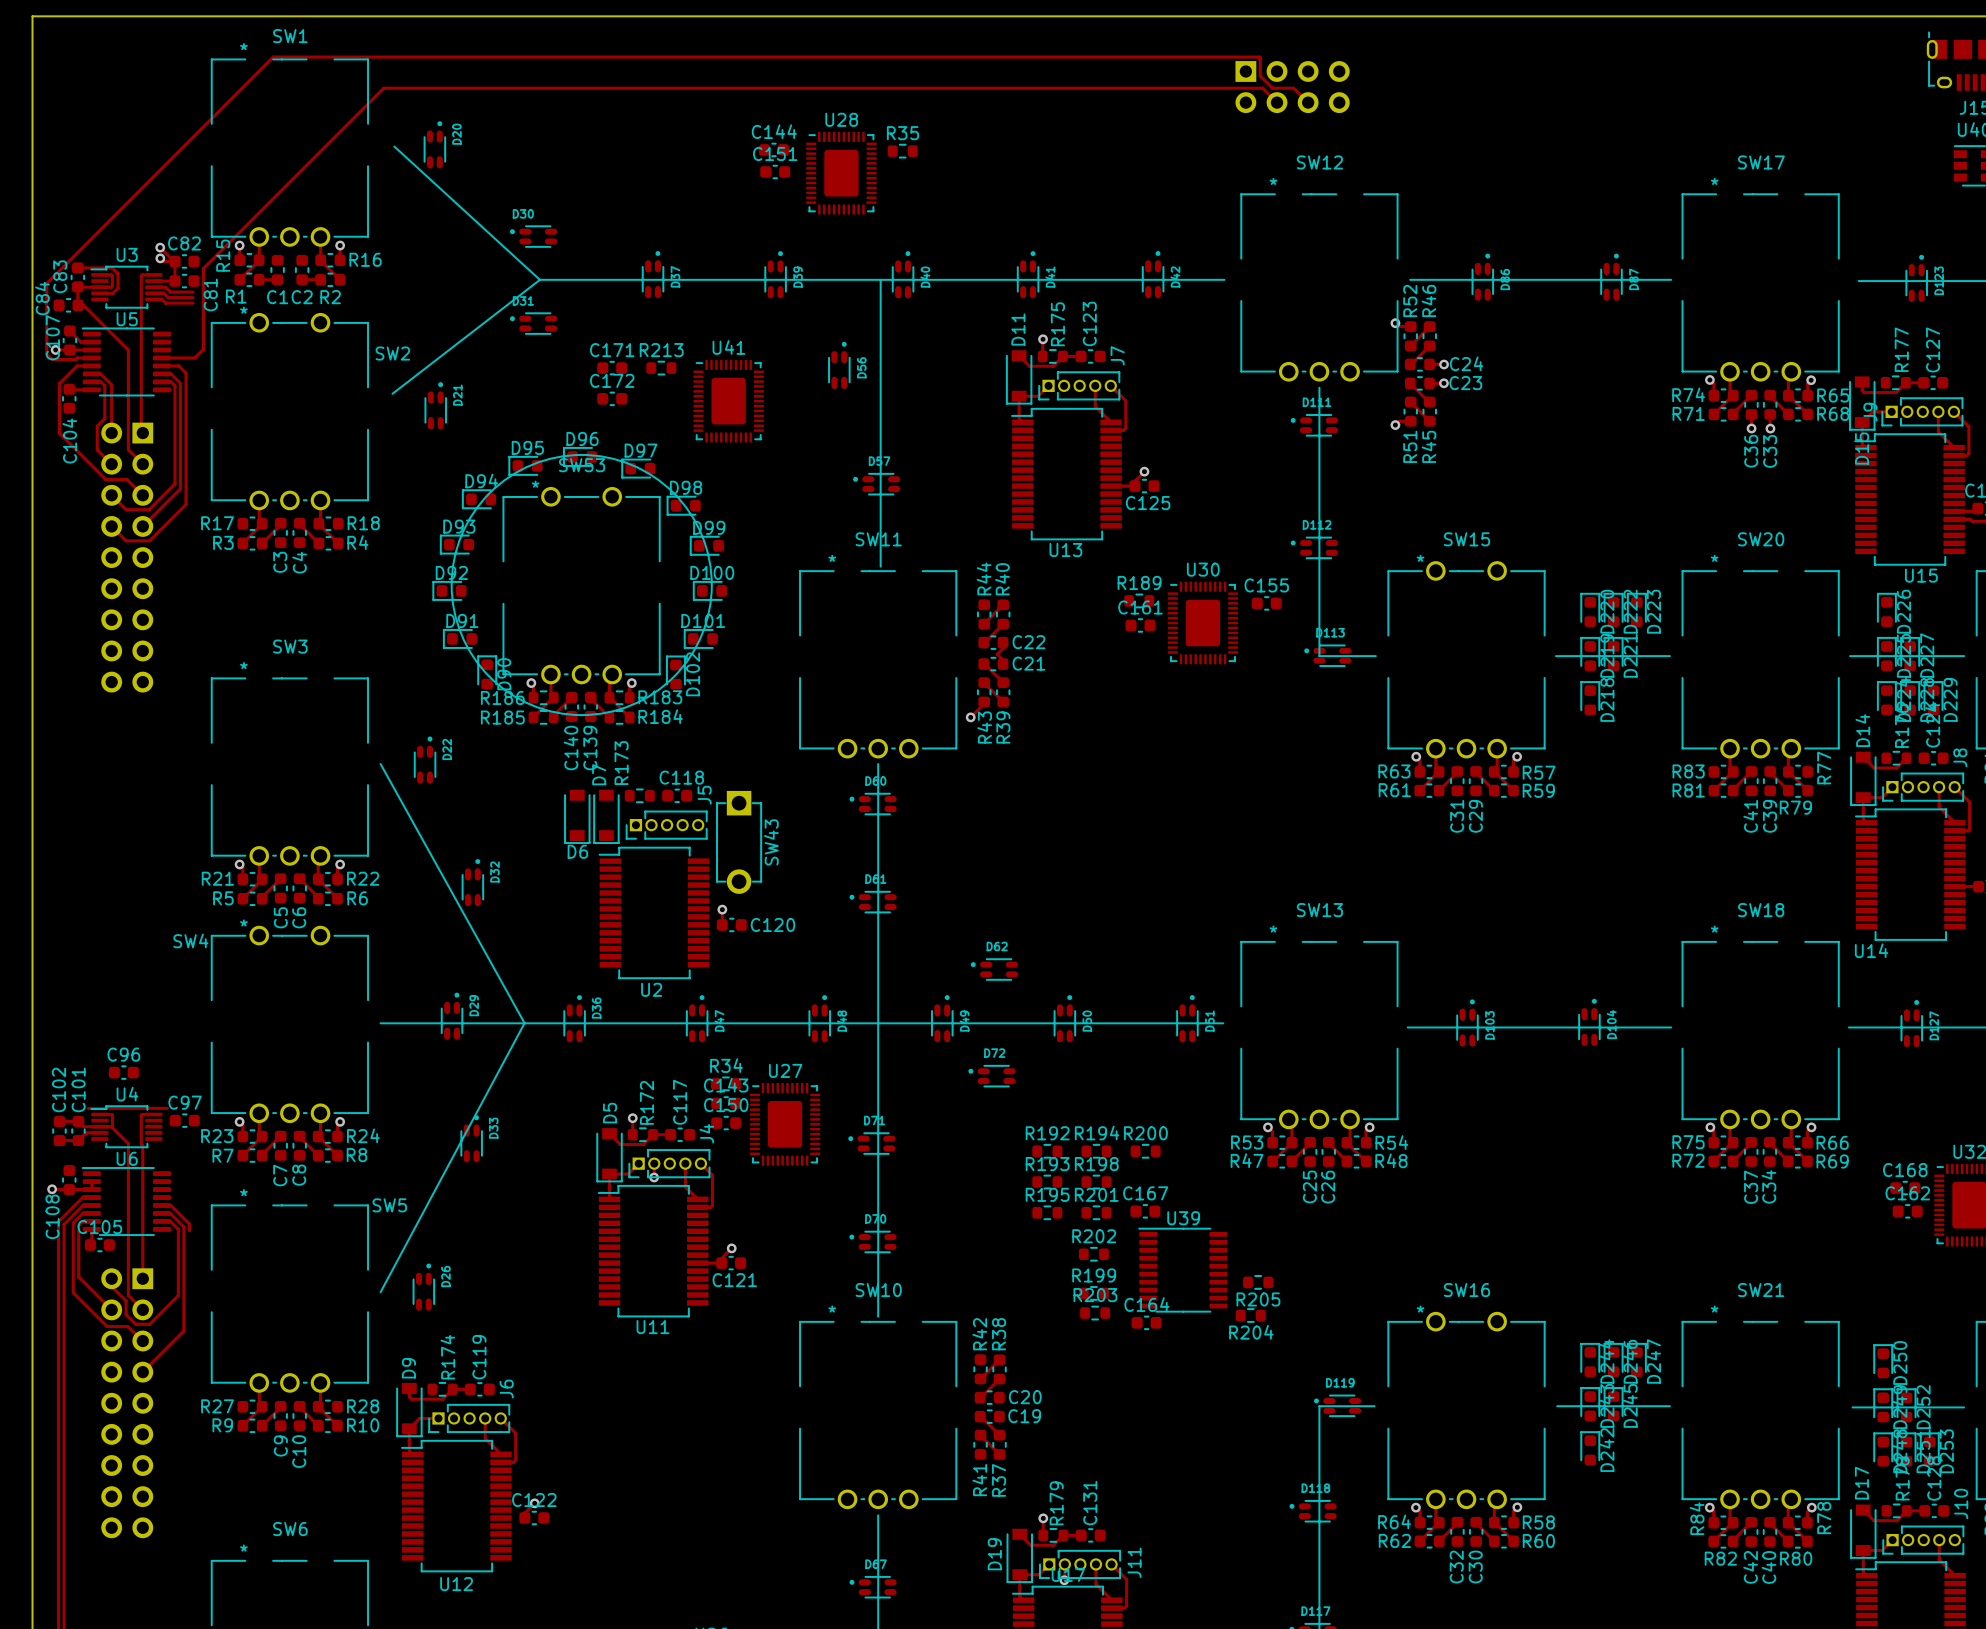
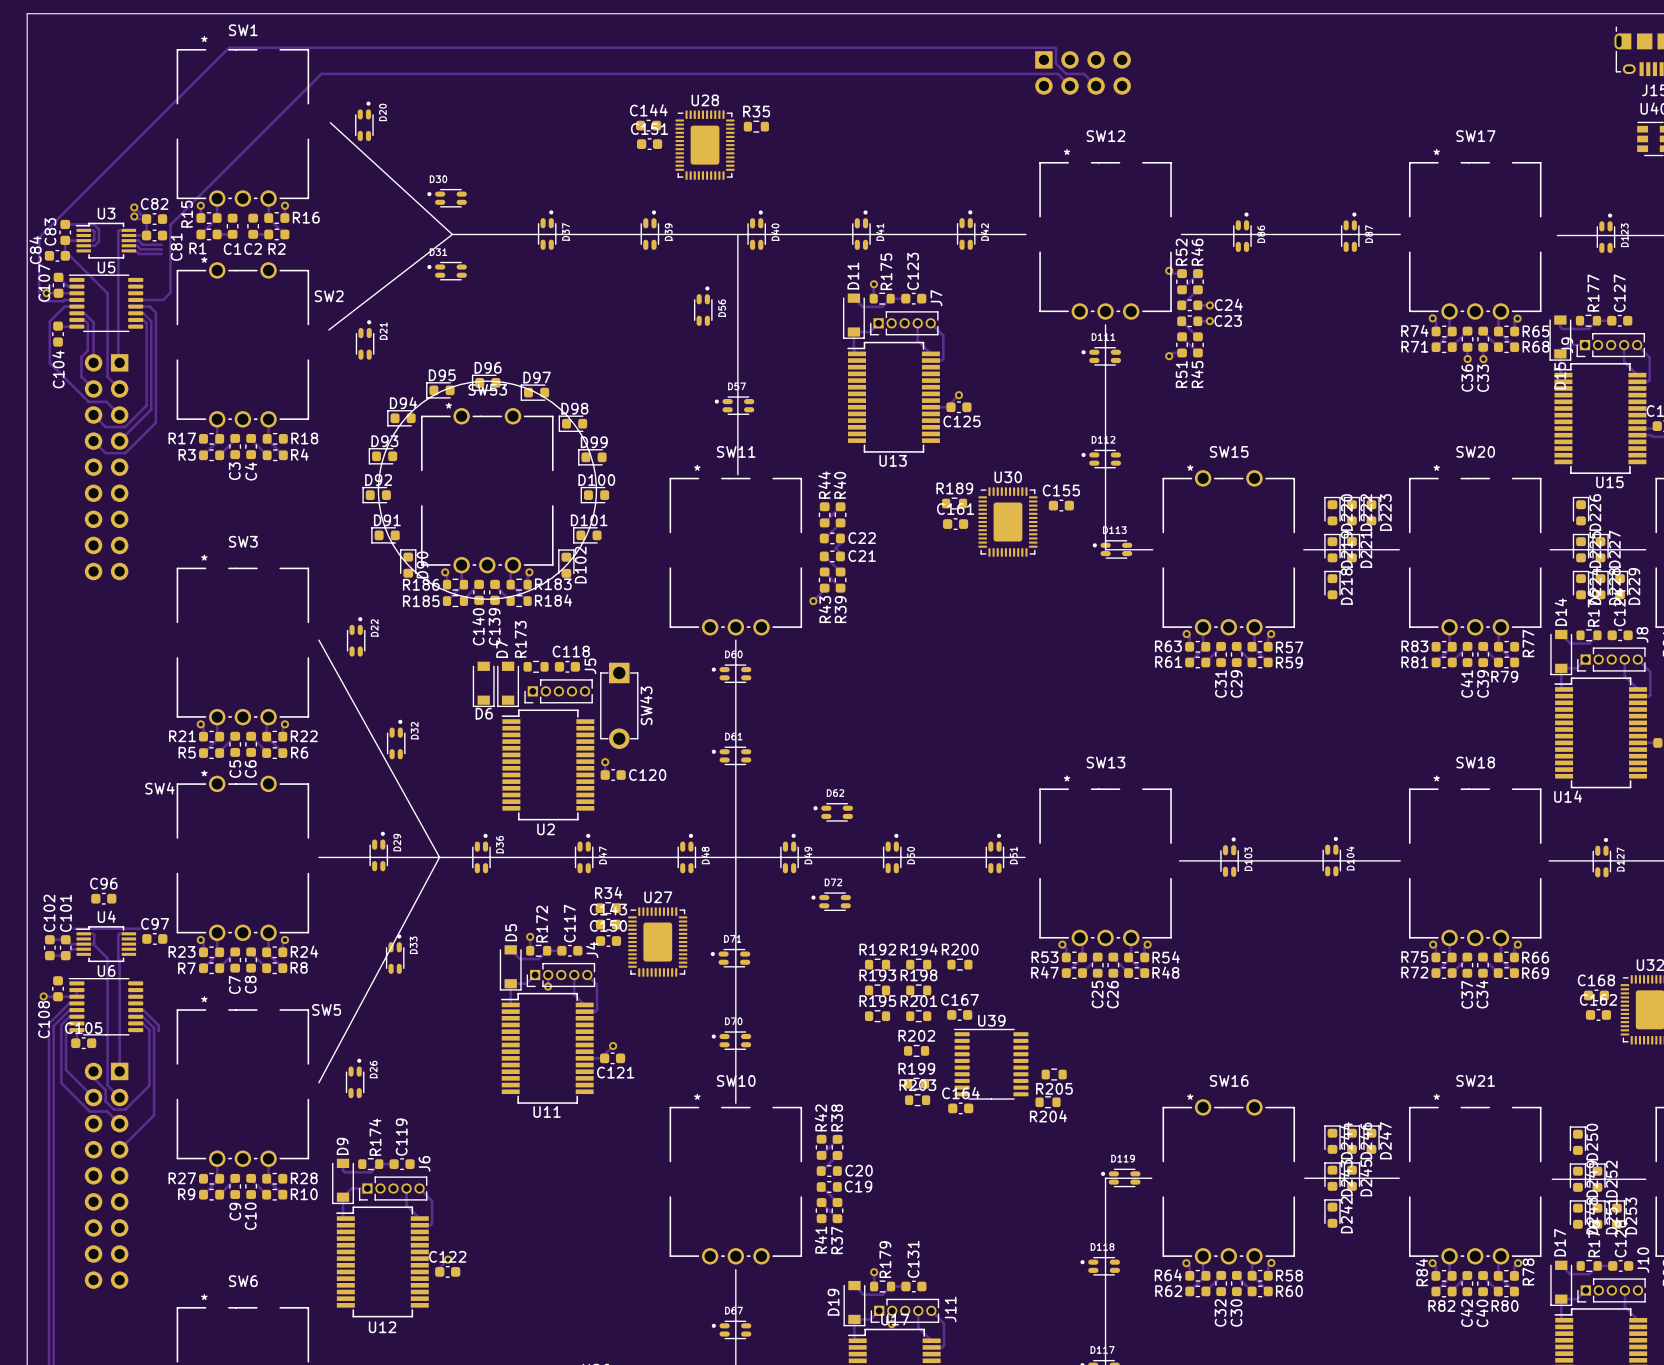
C171: (612, 368) -> none
R213: (661, 368) -> none
C172: (612, 398) -> none
U41: (728, 401) -> none

